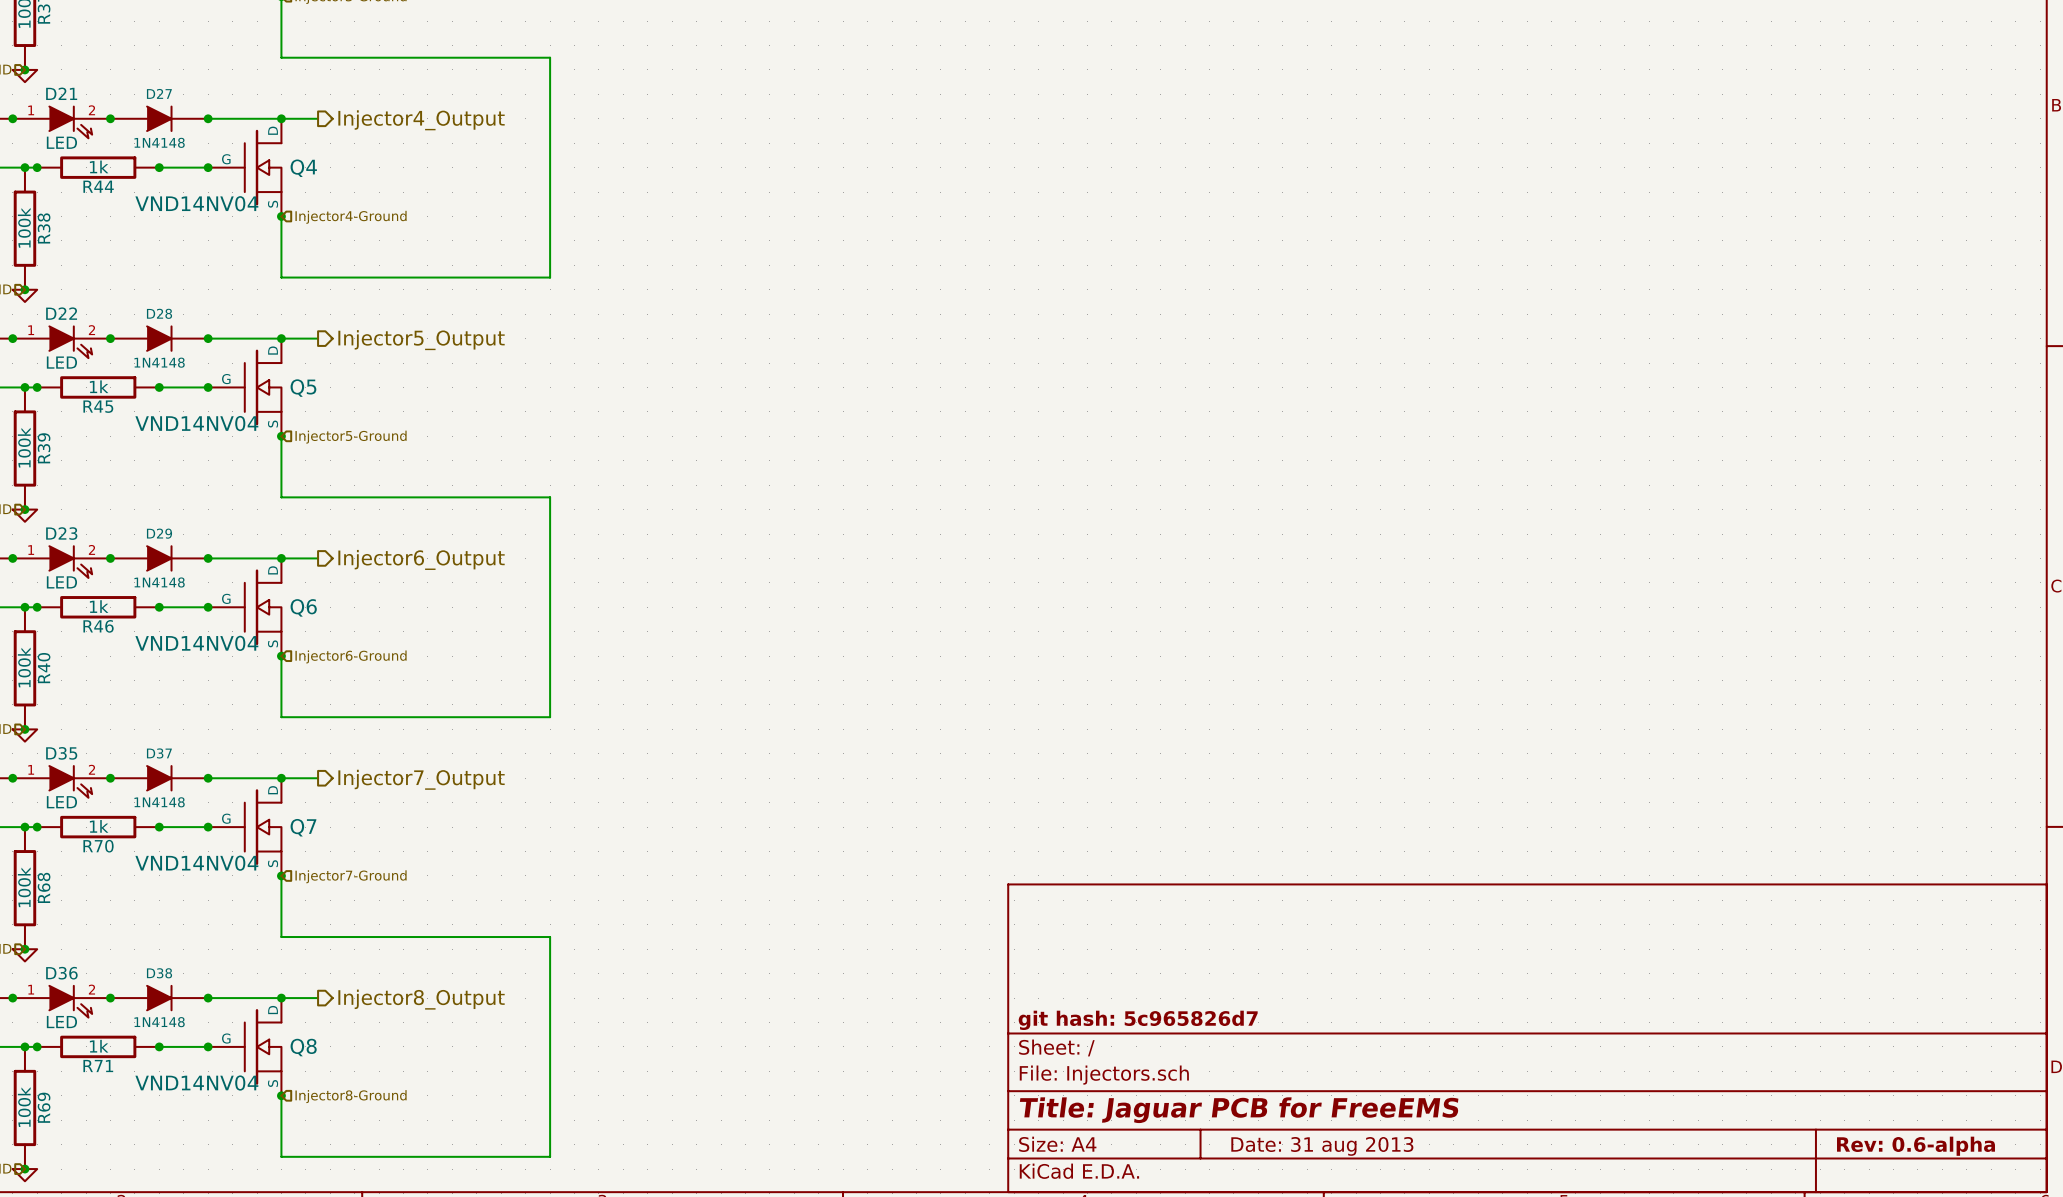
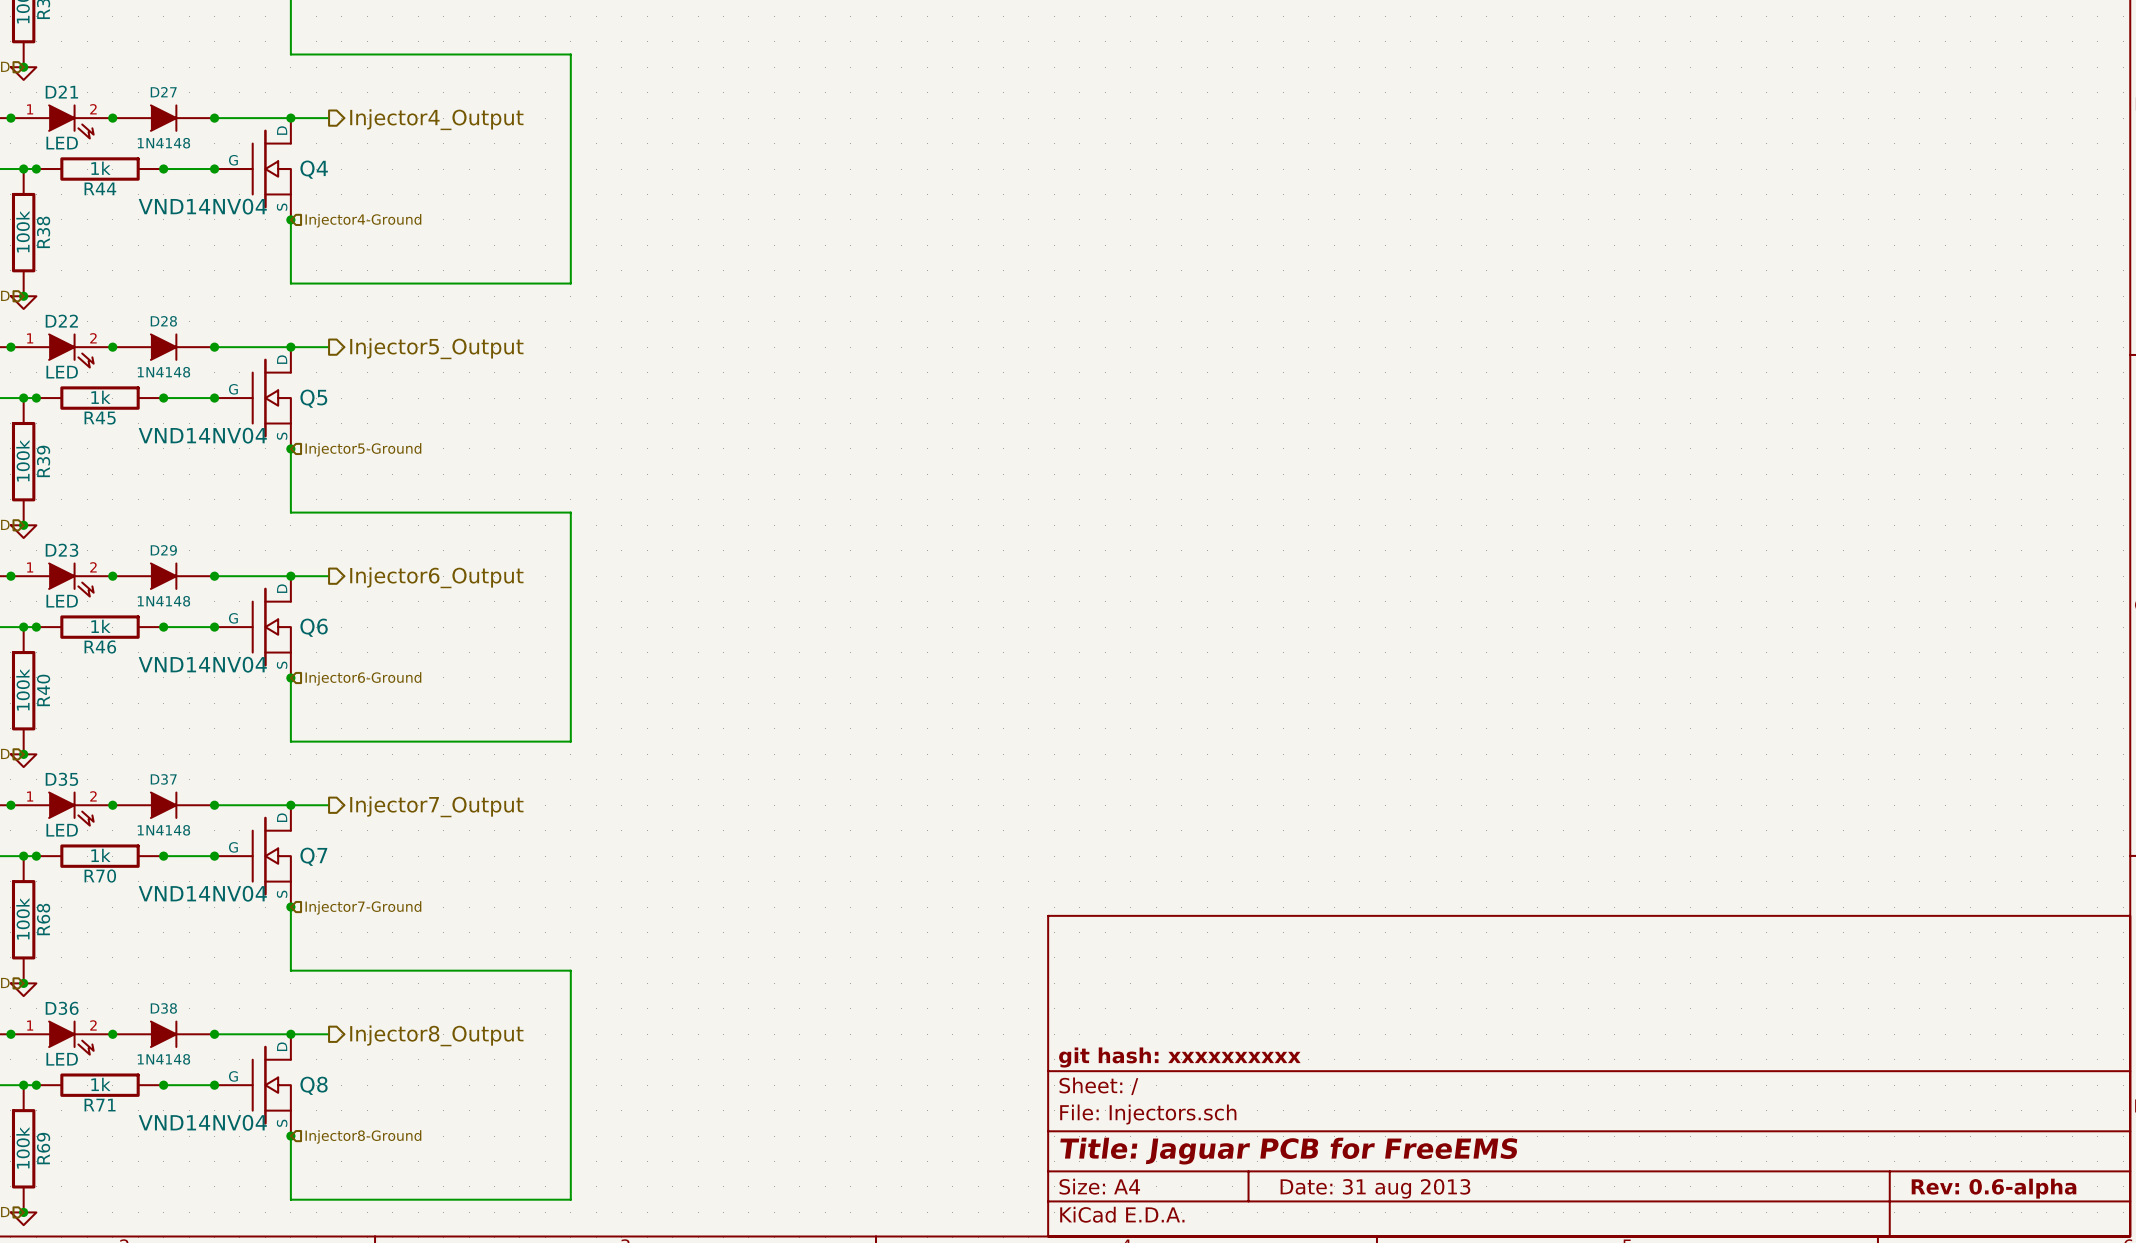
title block: git hash: 5c965826d7 (1138, 1020) -> git hash: xxxxxxxxxx (1179, 1057)

